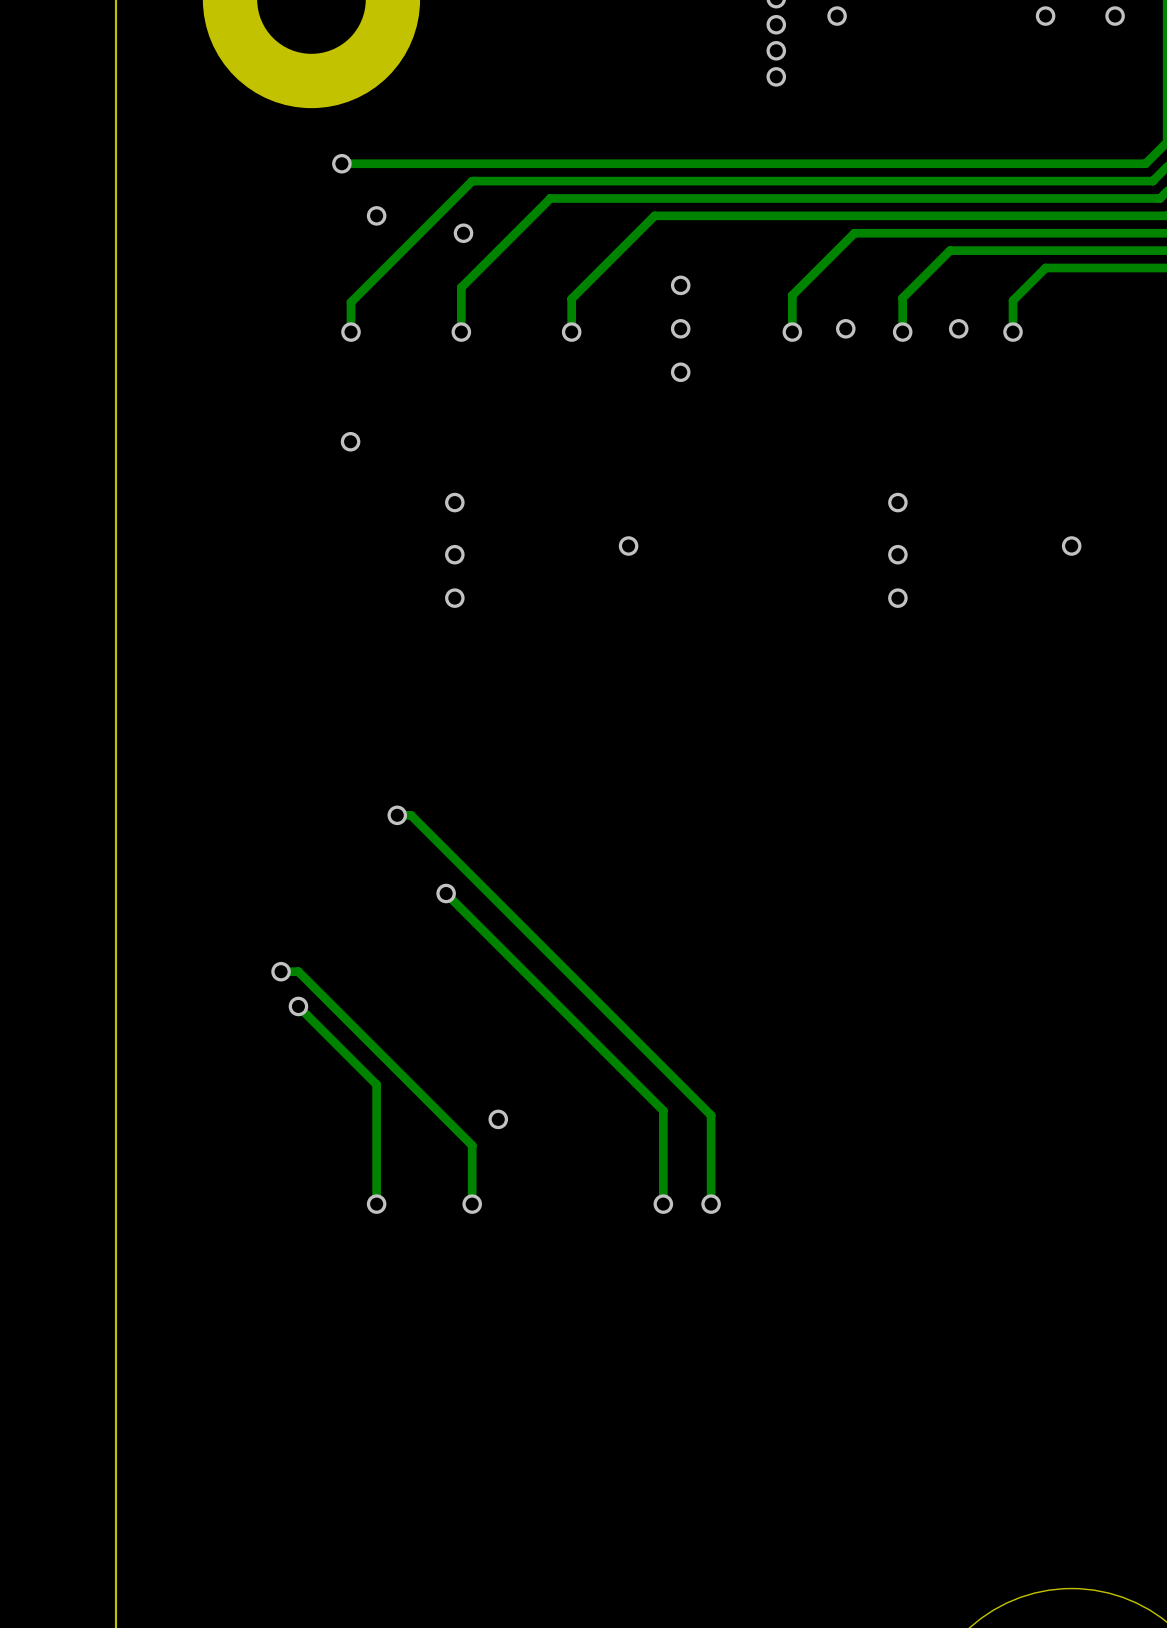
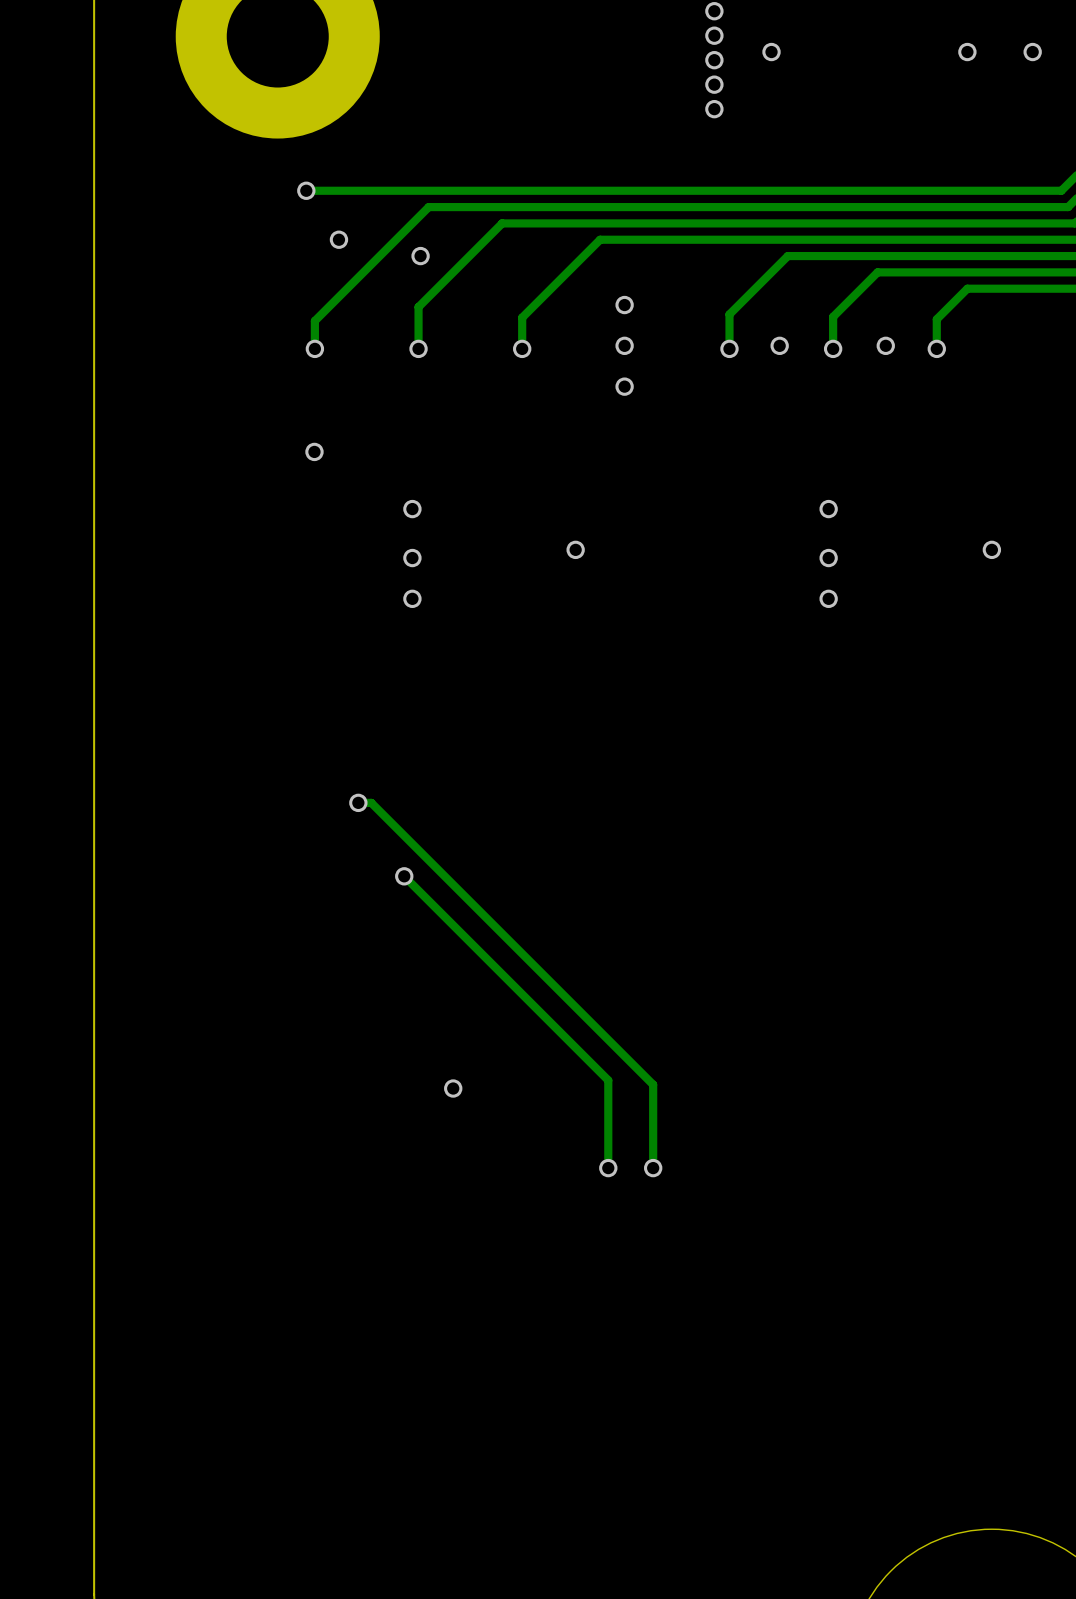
track: (281, 971) (298, 971) (472, 1145) (472, 1204) -> none
via: (281, 971) -> none
track: (298, 1006) (376, 1084) (376, 1204) -> none
via: (298, 1006) -> none
via: (376, 1204) -> none
via: (472, 1204) -> none

